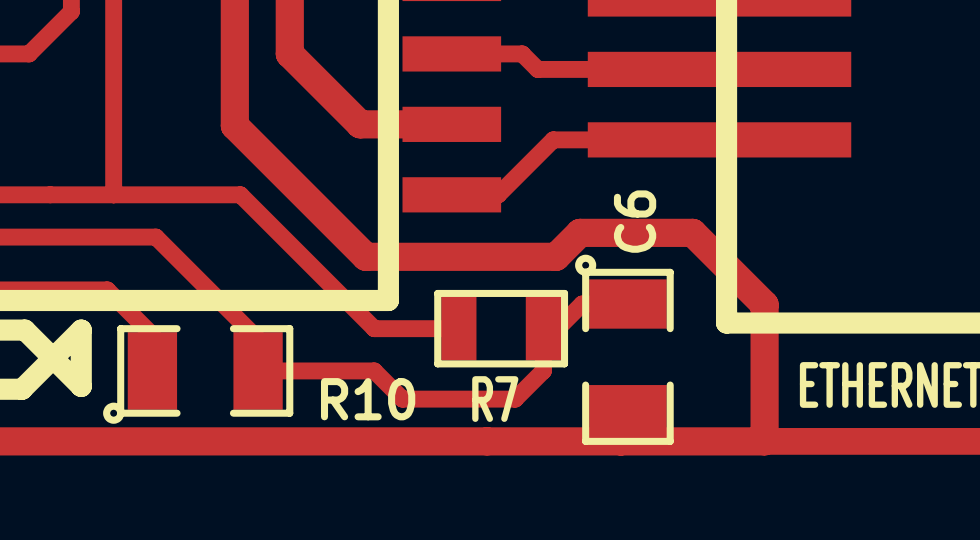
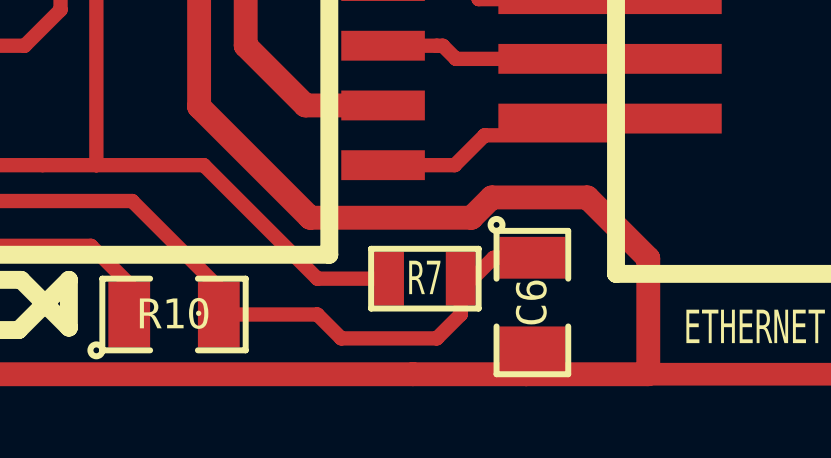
top track: (719, 139) (553, 139) (498, 194) -> (610, 135) (484, 135) (454, 165) (422, 165)
C6 name position: C6 (635, 221) -> C6 (531, 302)
R10 name position: R10 (368, 399) -> R10 (174, 313)
R7 name position: R7 (495, 399) -> R7 (424, 277)

